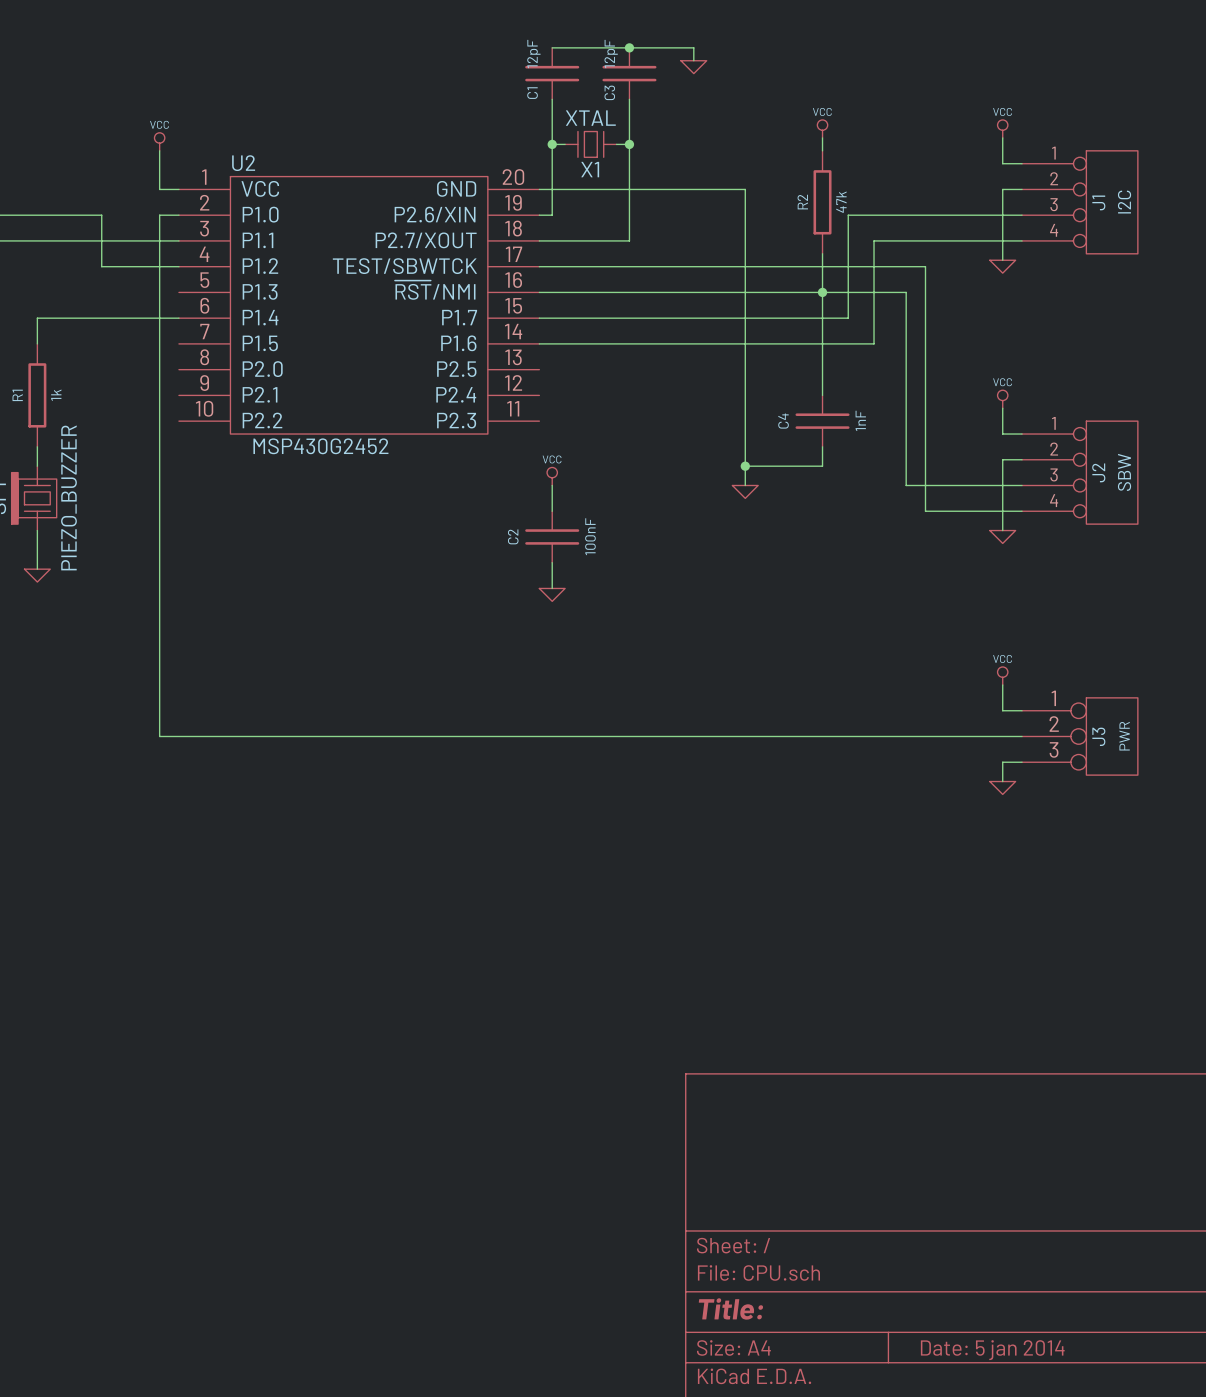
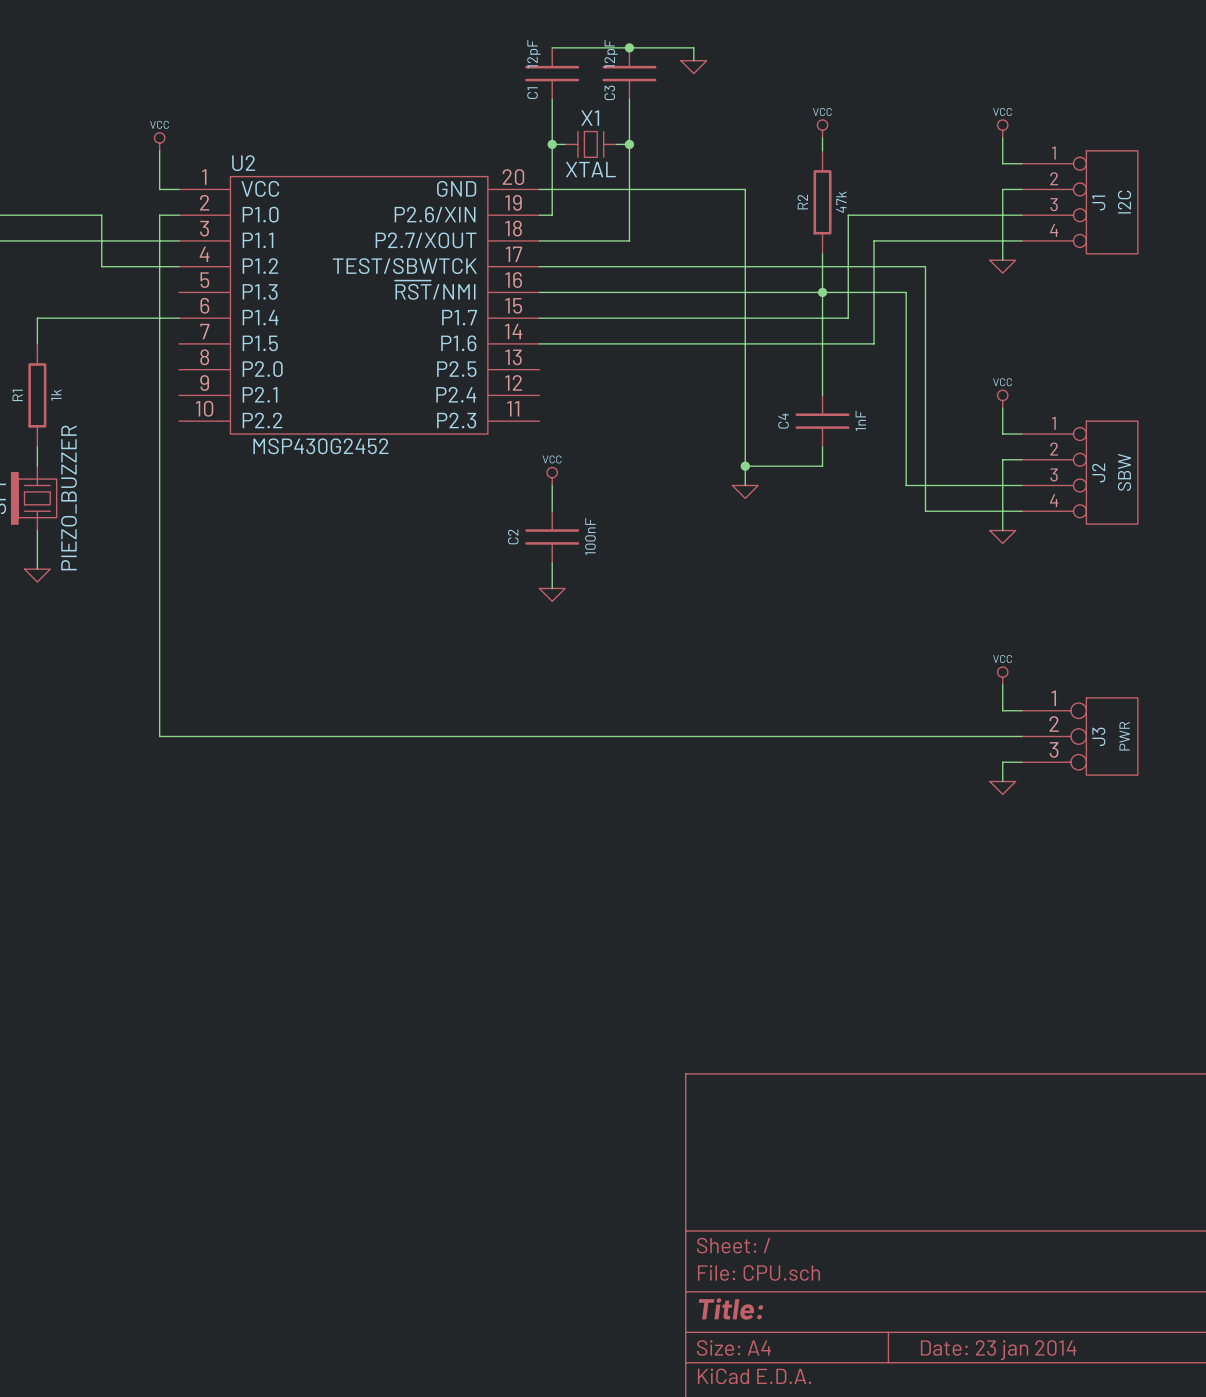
X1 value position: XTAL (590, 118) -> XTAL (590, 169)
X1 name position: X1 (590, 169) -> X1 (590, 118)
title block: Date: 5 jan 2014 (992, 1350) -> Date: 23 jan 2014 (998, 1350)

